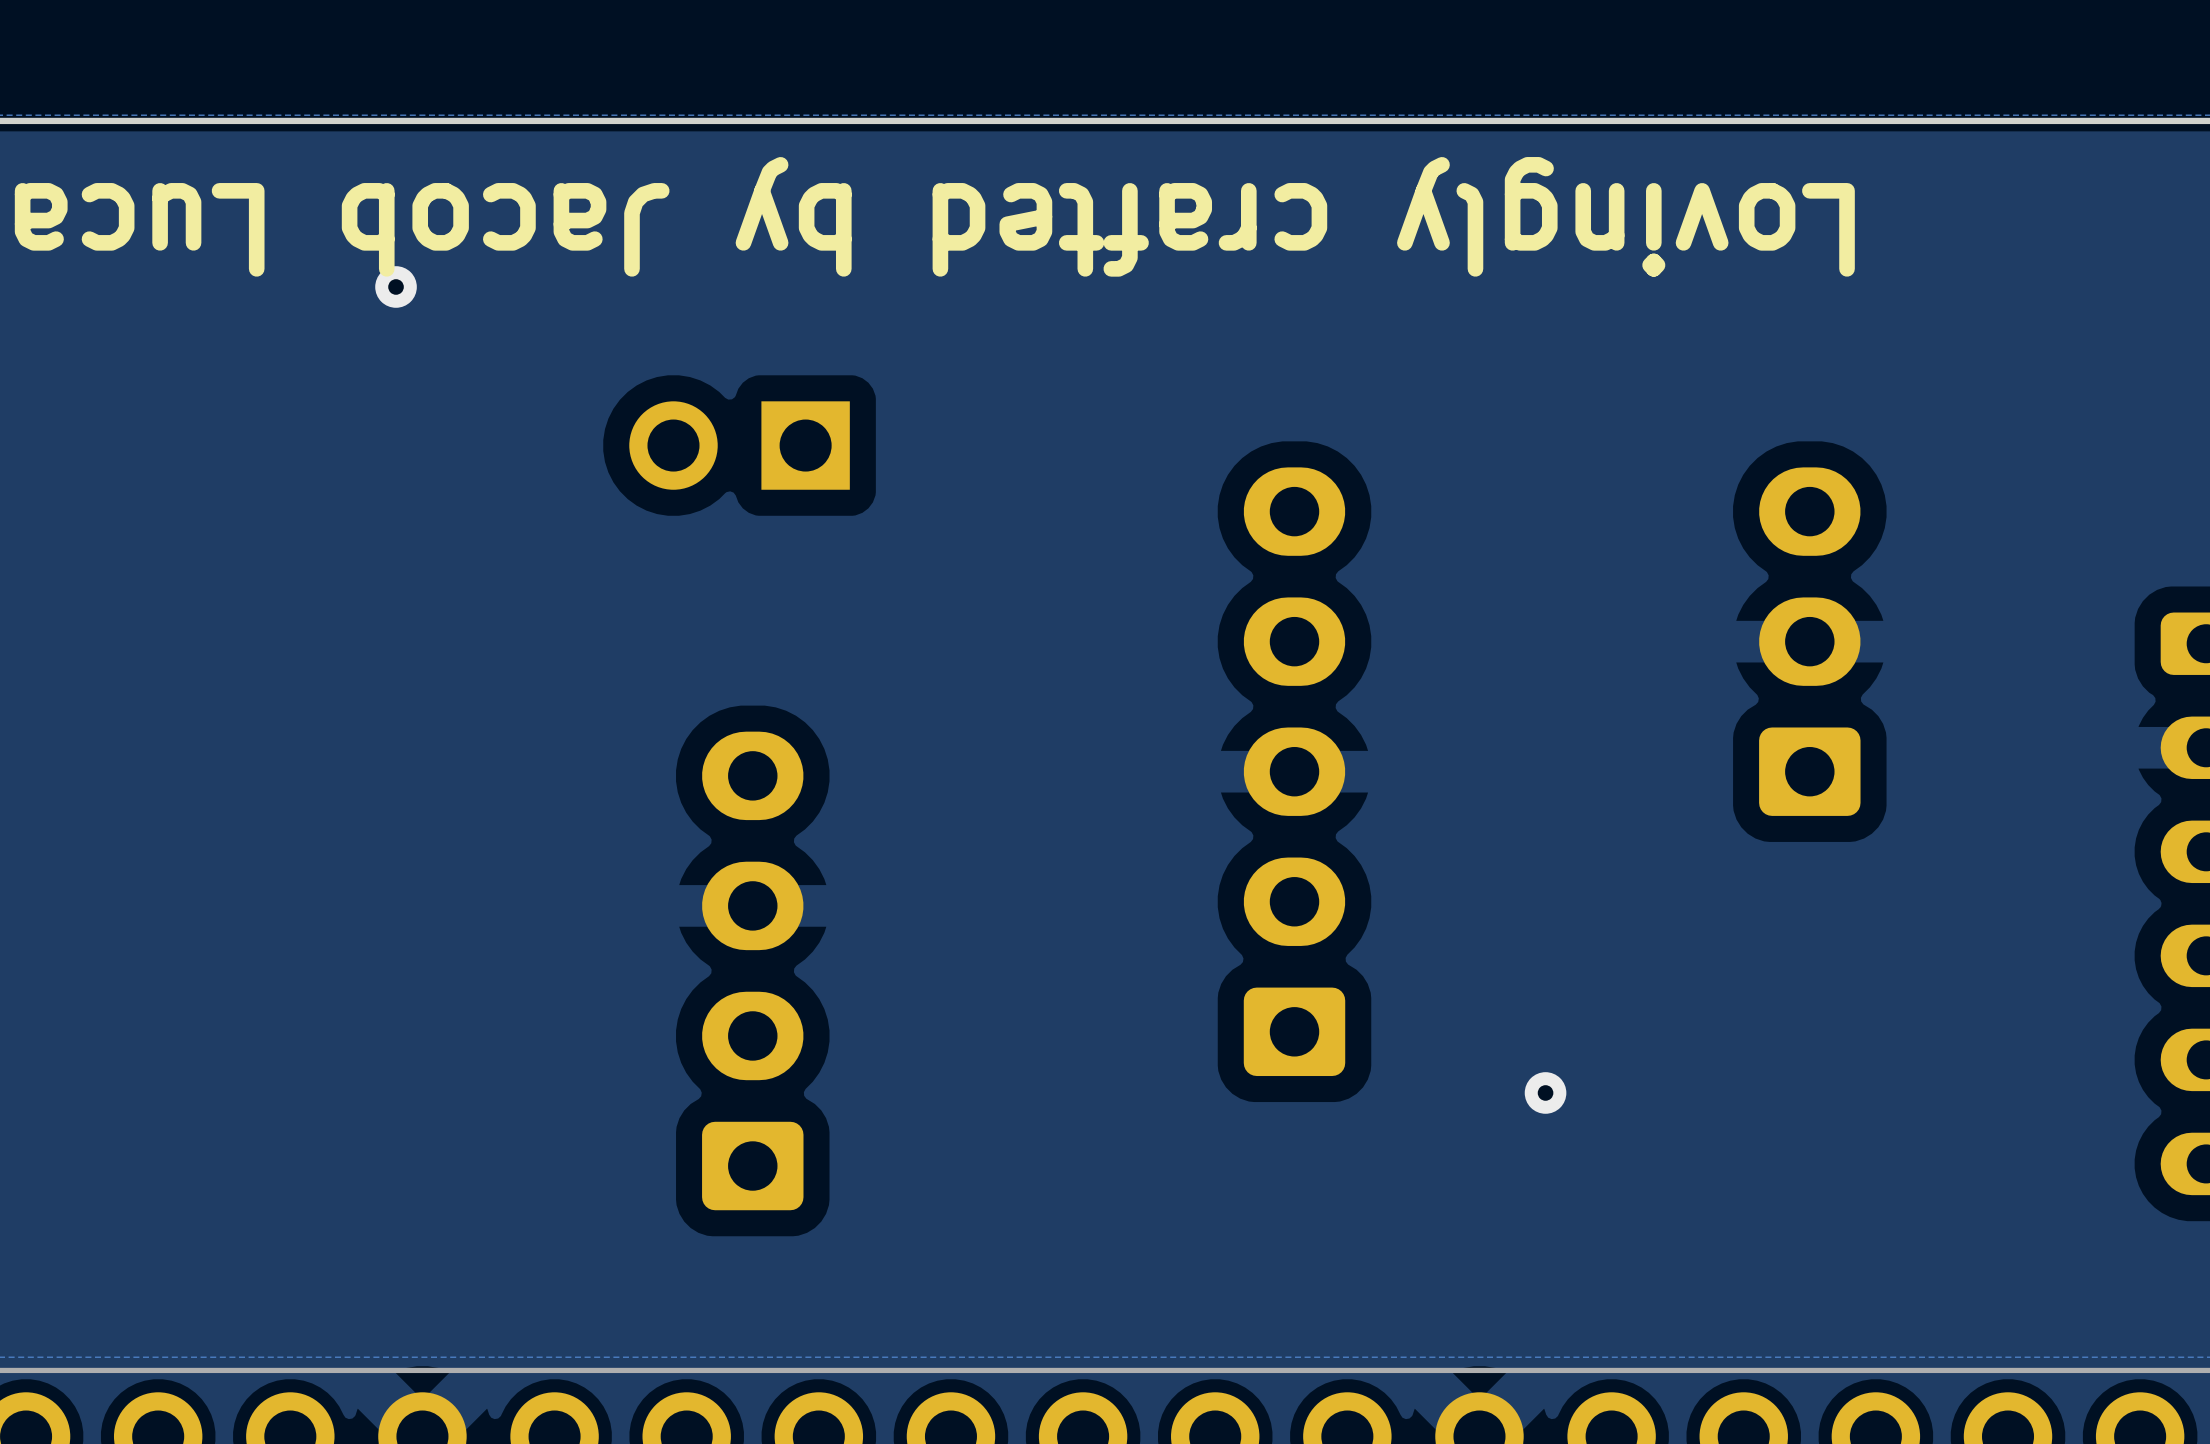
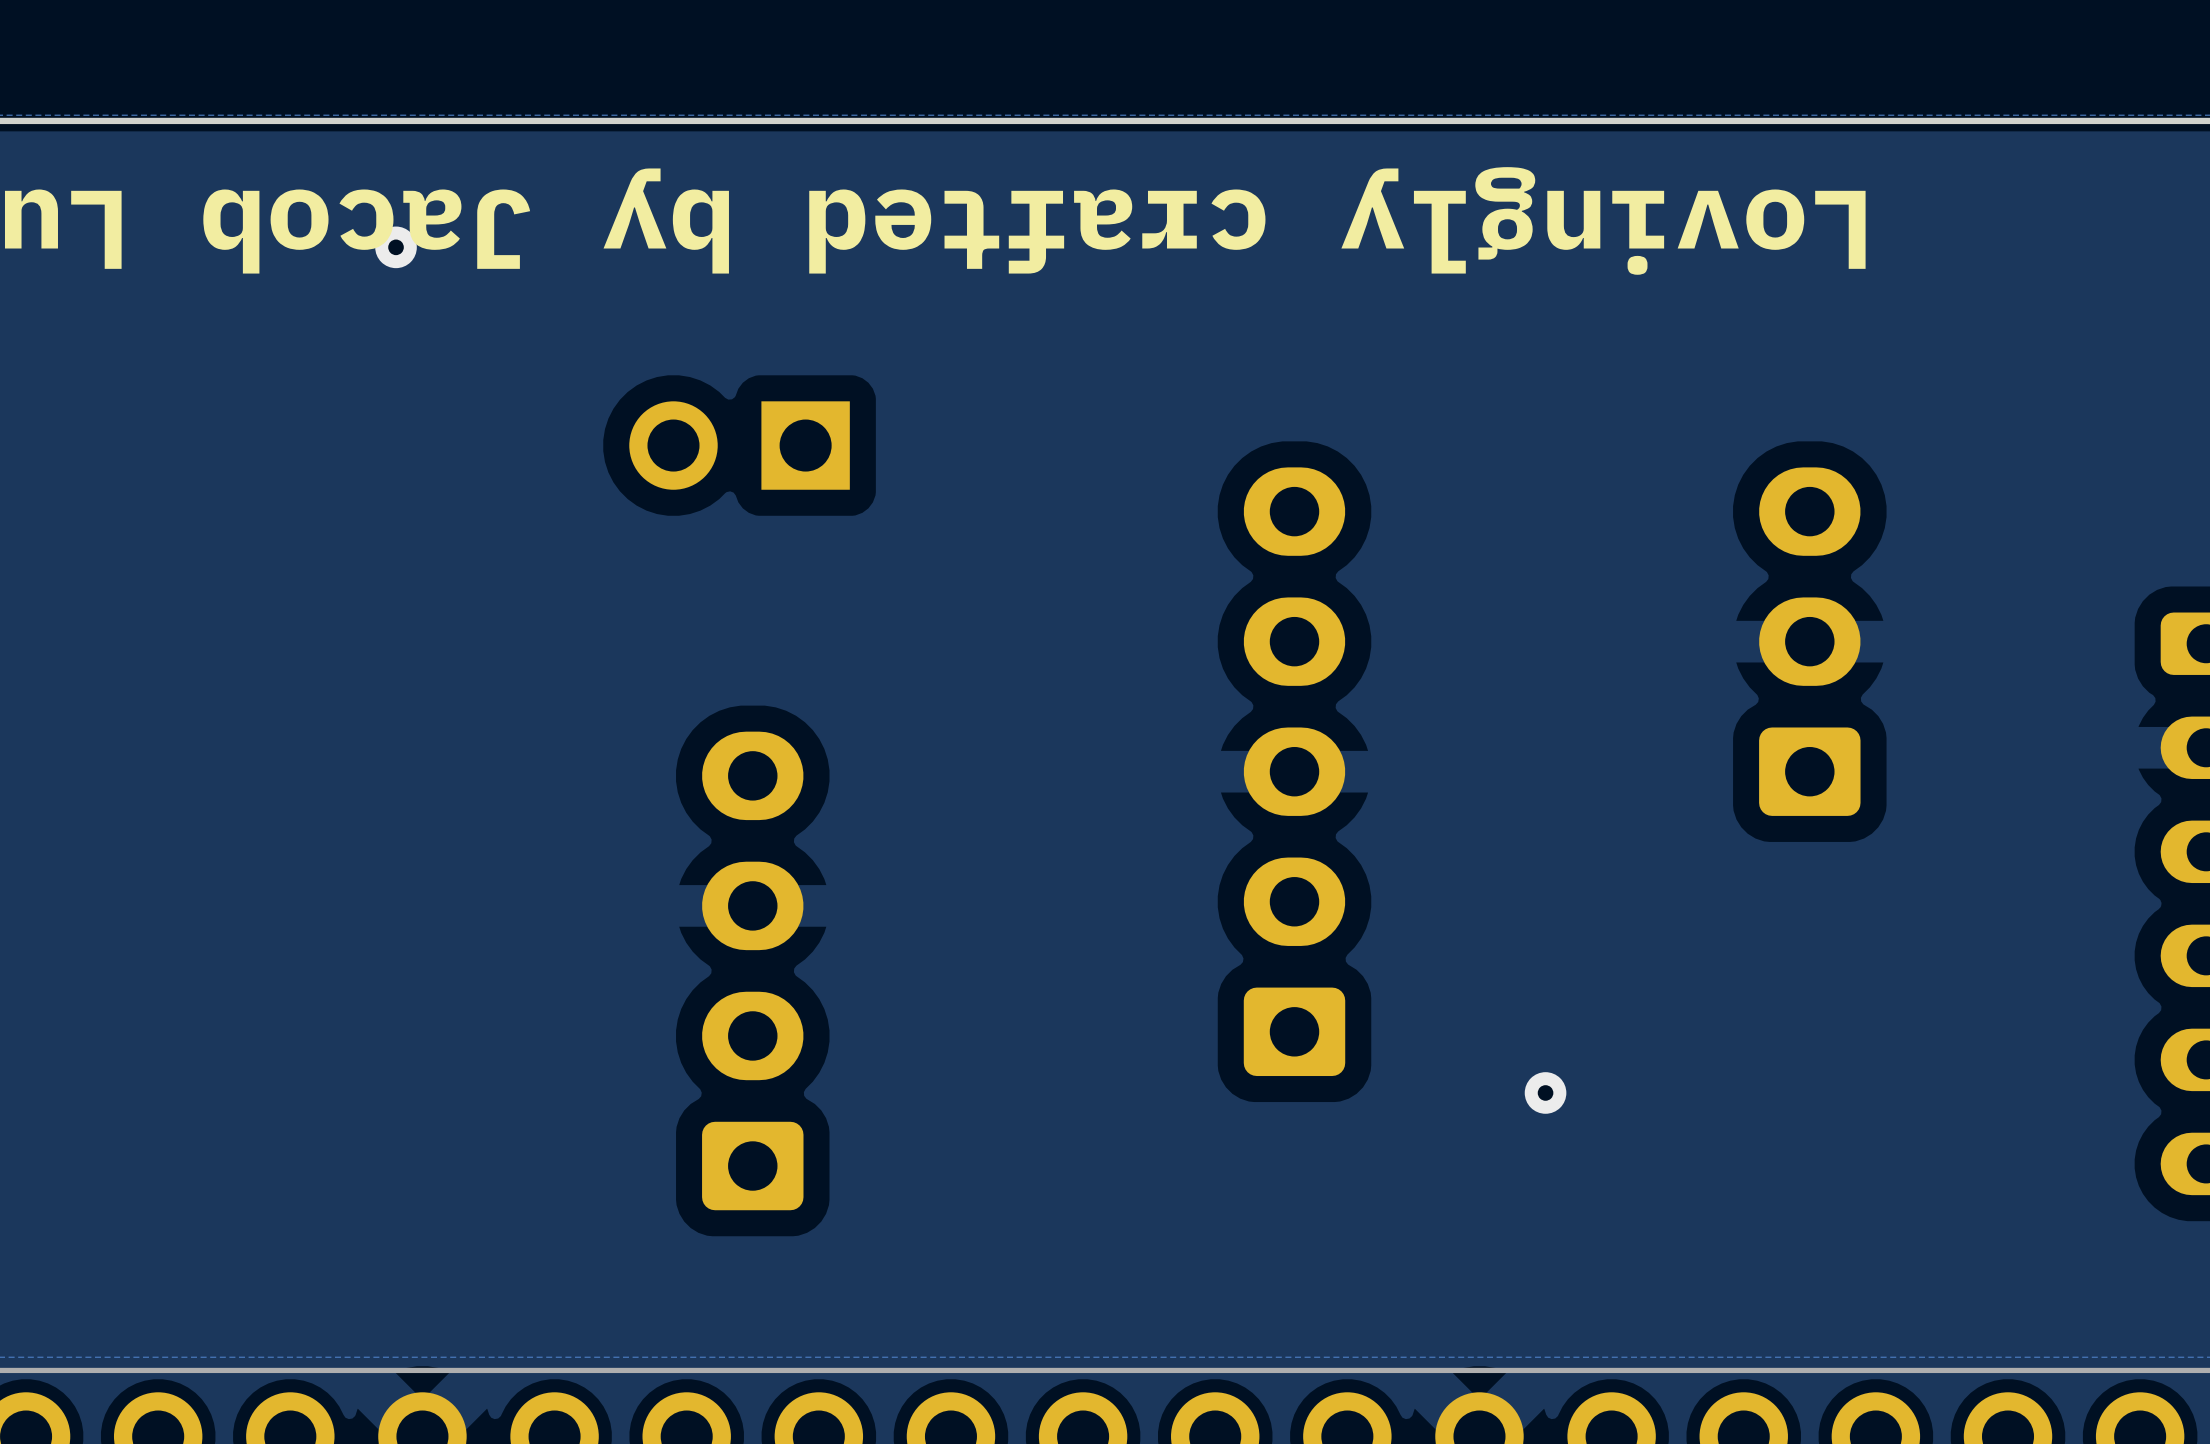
via position: (396, 286) -> (396, 247)

